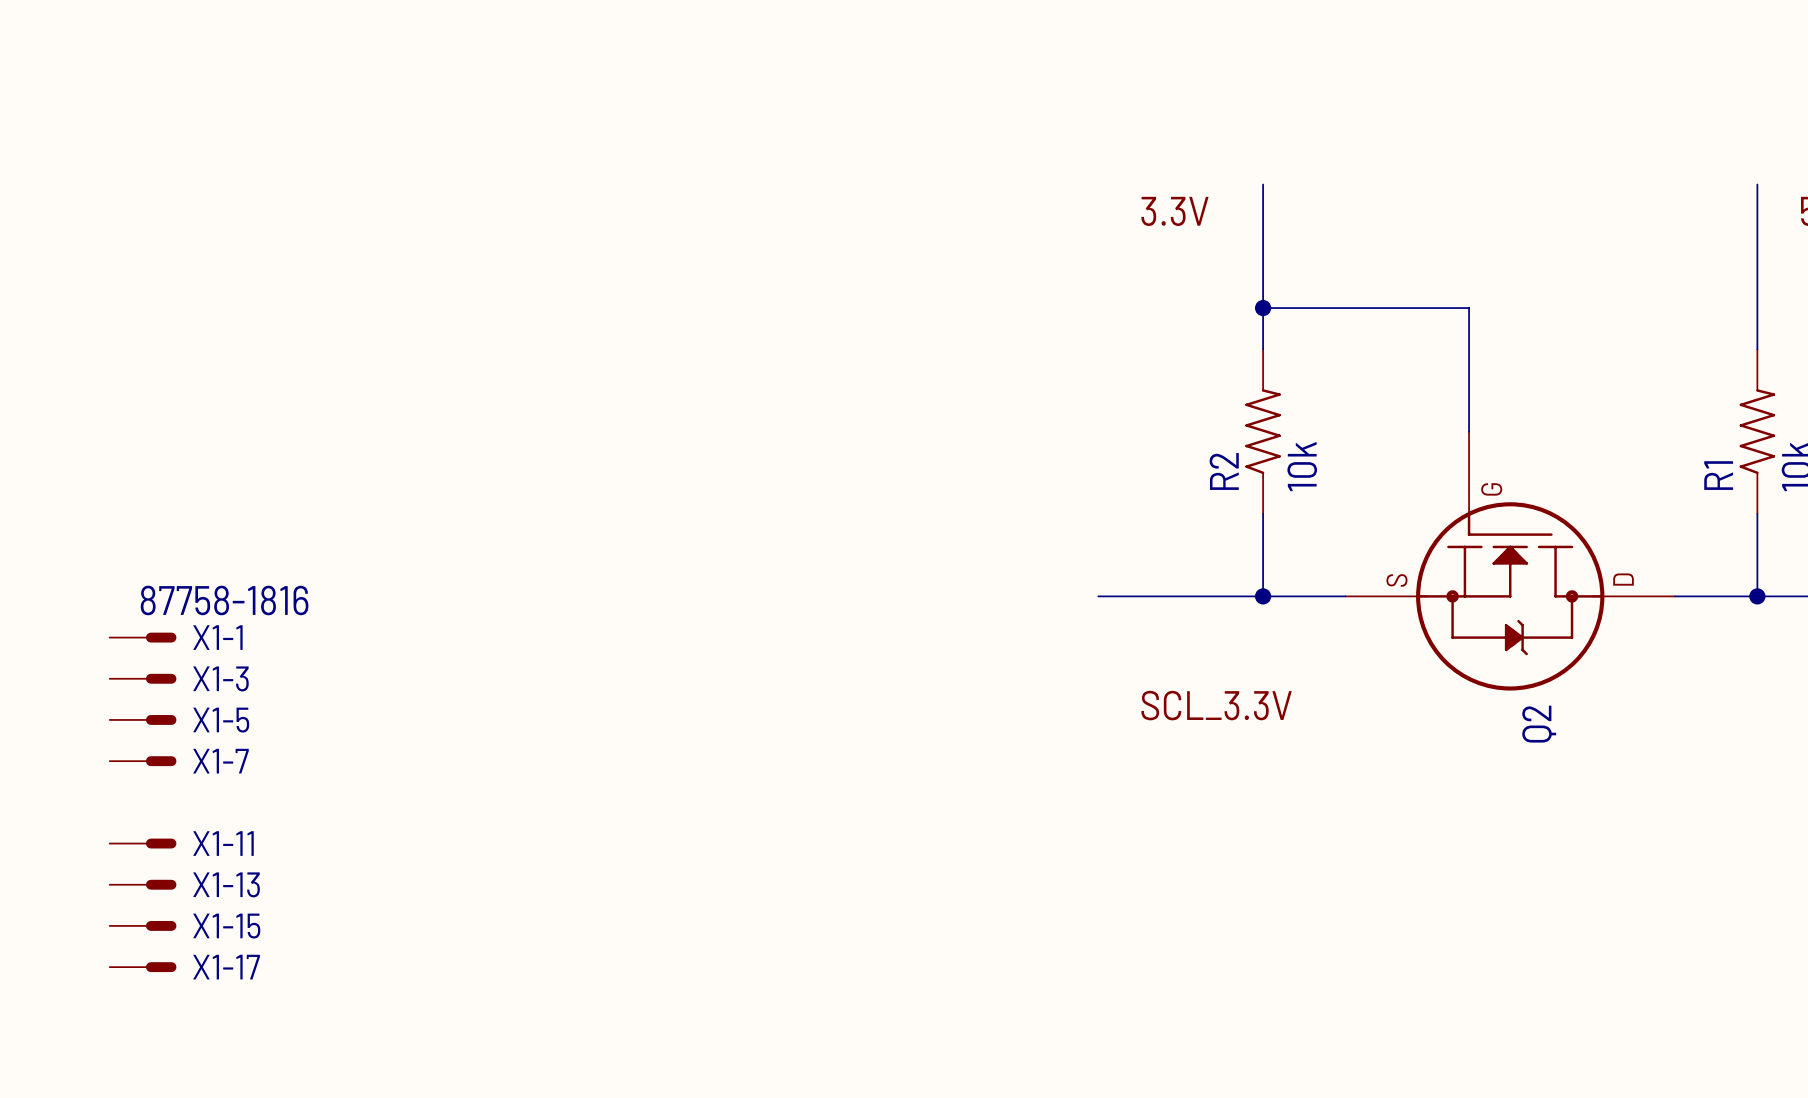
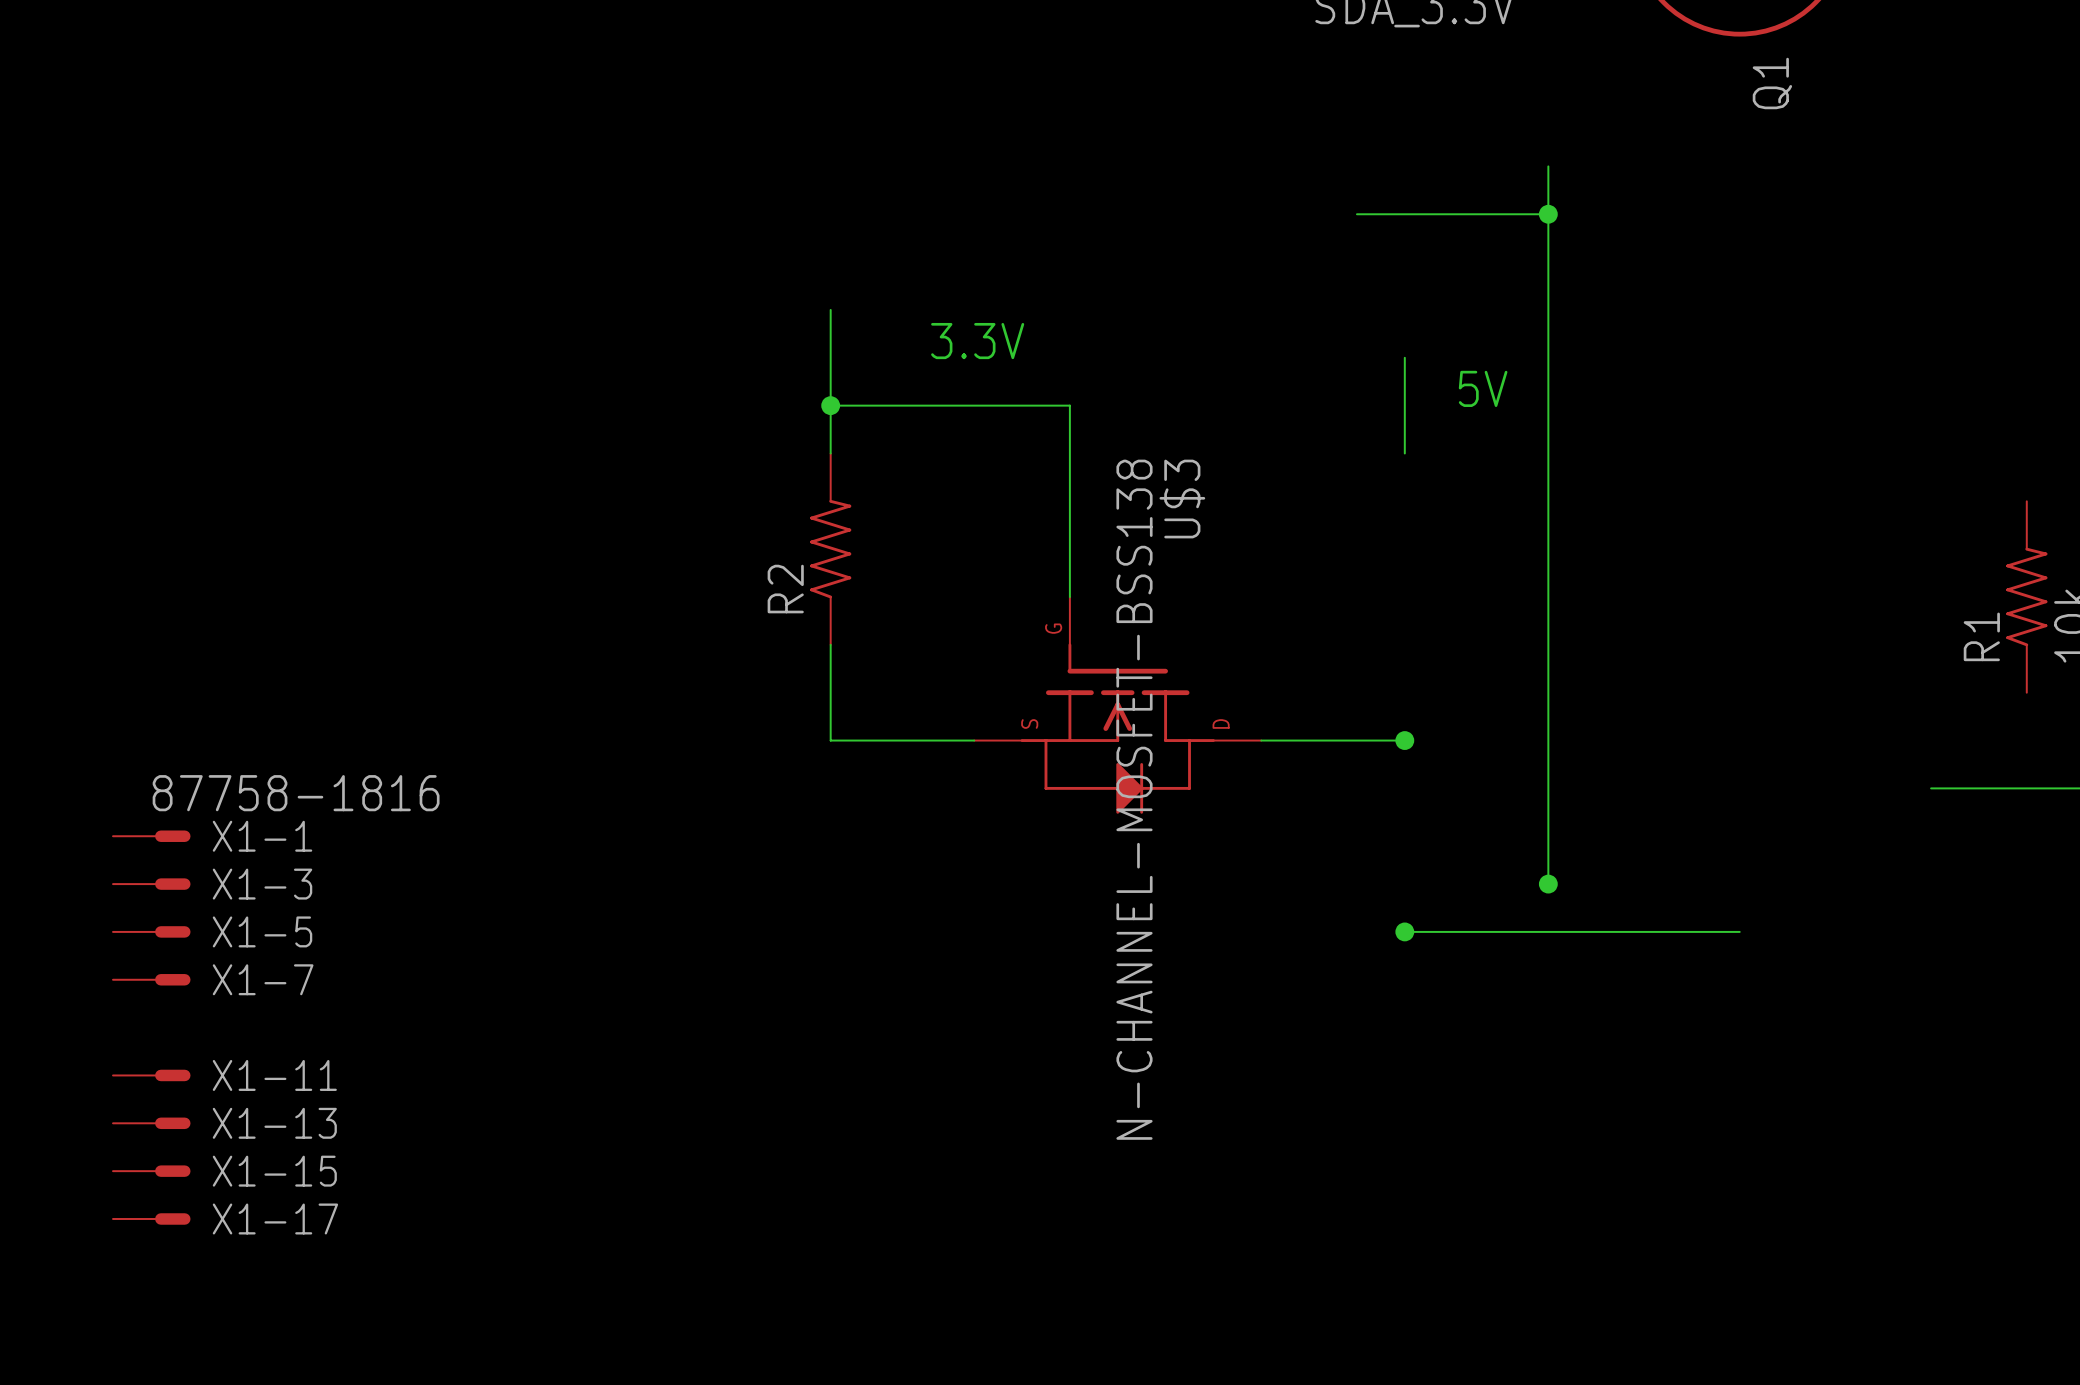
wire: none -> (1548, 166) (1548, 884)
wire: none -> (1356, 214) (1548, 214)
junction: none -> (1548, 214)
wire: none -> (830, 309) (830, 453)
wire: (1263, 184) (1263, 349) -> none
wire: (1757, 184) (1757, 349) -> none
text: none -> 3.3V (977, 341)
label: 3.3V (1174, 211) -> none
text: none -> 5V (1483, 388)
wire: none -> (830, 405) (1069, 405) (1069, 597)
junction: none -> (830, 405)
wire: (1263, 308) (1469, 308) (1469, 431) -> none
junction: (1263, 308) -> none
R2 position: (1263, 431) -> (830, 549)
R2 value: 10k (1302, 466) -> none
wire: none -> (830, 644) (830, 740) (974, 740)
wire: (1263, 514) (1263, 596) -> (1404, 357) (1404, 453)
wire: (1757, 514) (1757, 596) -> none
U$3: none -> N-CHANNEL-MOSFET-BSS138 (1117, 705)
wire: none -> (1261, 740) (1404, 740)
junction: none -> (1404, 740)
Q2: (1510, 561) -> none
wire: (1098, 596) (1345, 596) -> none
junction: (1263, 596) -> none
junction: (1757, 596) -> none
junction: none -> (1548, 884)
label: SCL_3.3V (1216, 705) -> none
wire: none -> (1404, 931) (1739, 931)
junction: none -> (1404, 931)

